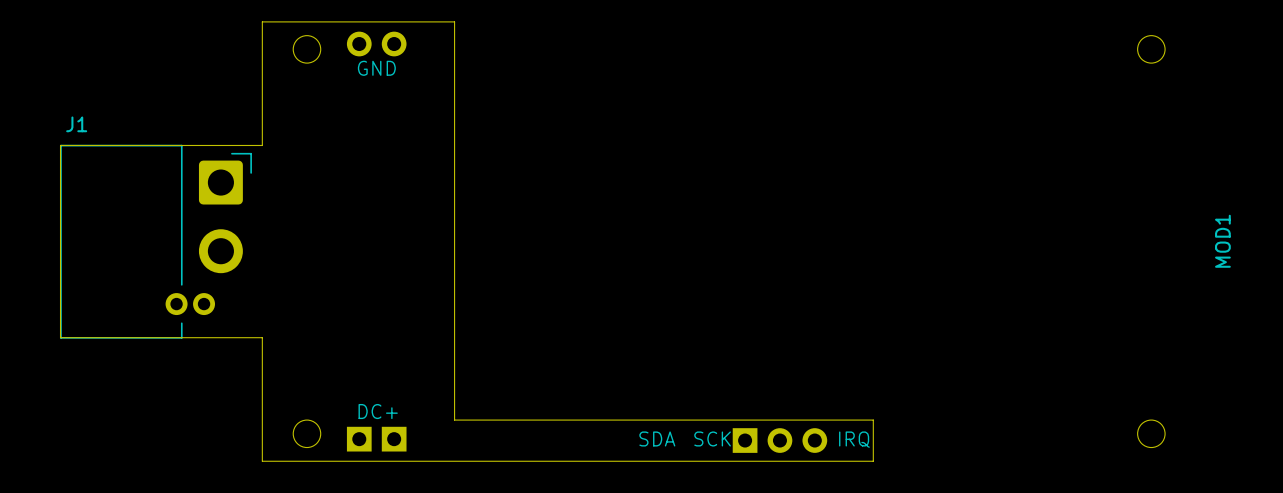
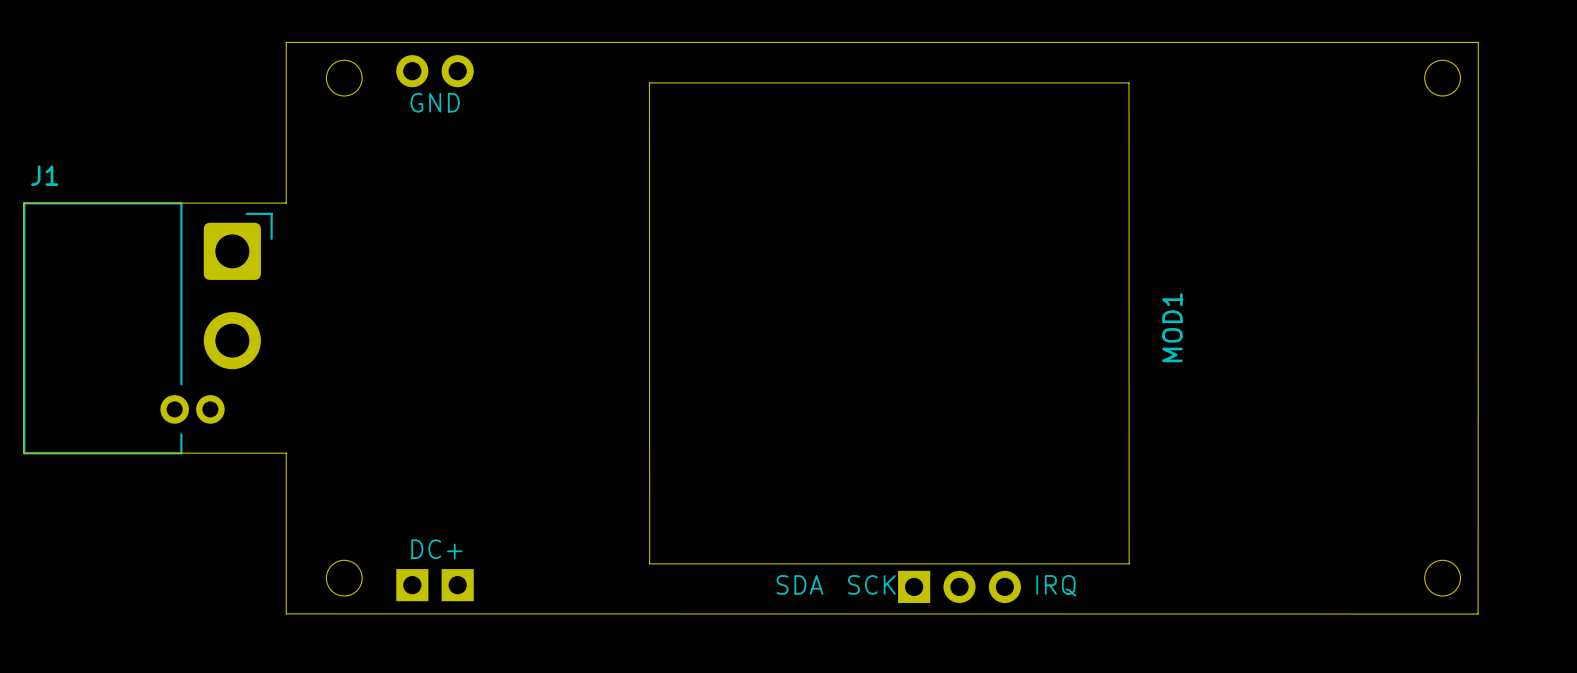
board edge: (454, 21) (454, 420) (873, 420) (873, 461) (262, 461) -> (536, 42) (1478, 42) (1478, 614) (286, 613)
board edge: none -> (649, 82) (649, 563) (1129, 563) (1128, 82) (649, 82)
MOD1 name position: MOD1 (1222, 241) -> MOD1 (1172, 327)

